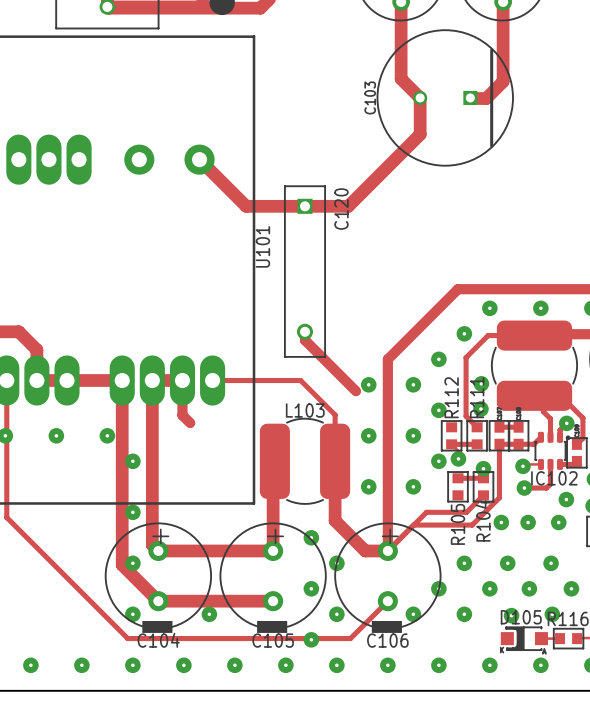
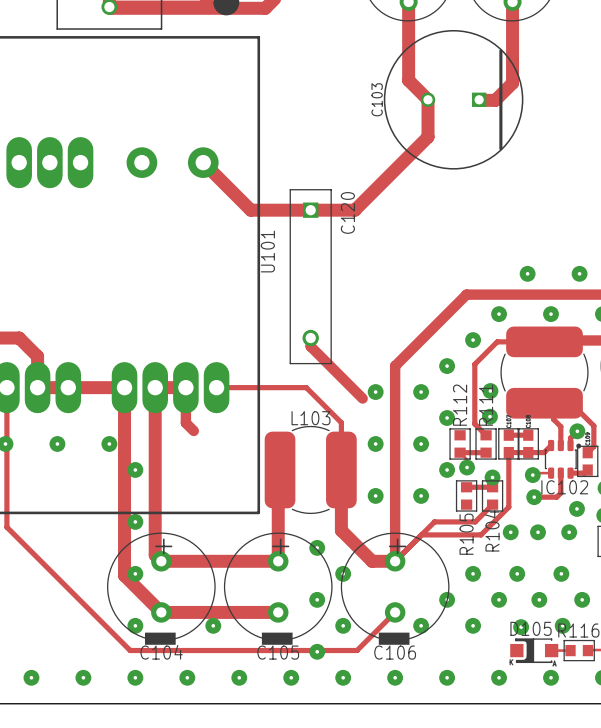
via: none -> (527, 273)
via: none -> (579, 273)

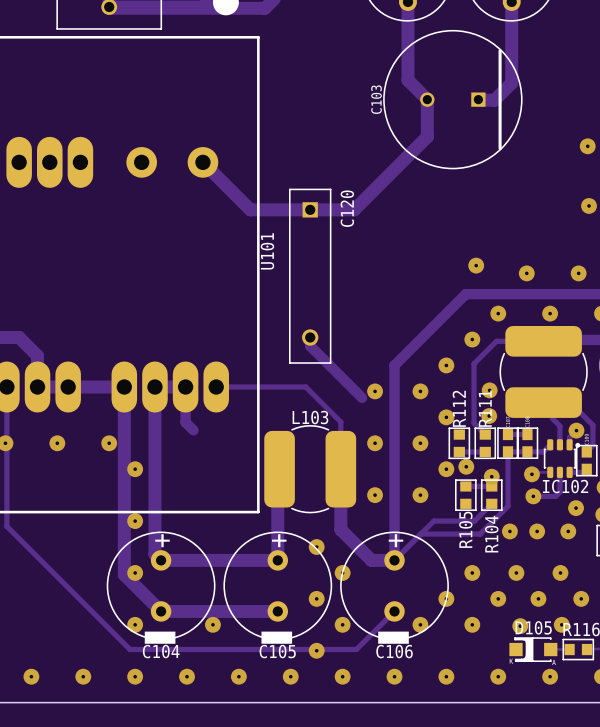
via: none -> (587, 146)
via: none -> (589, 205)
via: none -> (476, 265)

